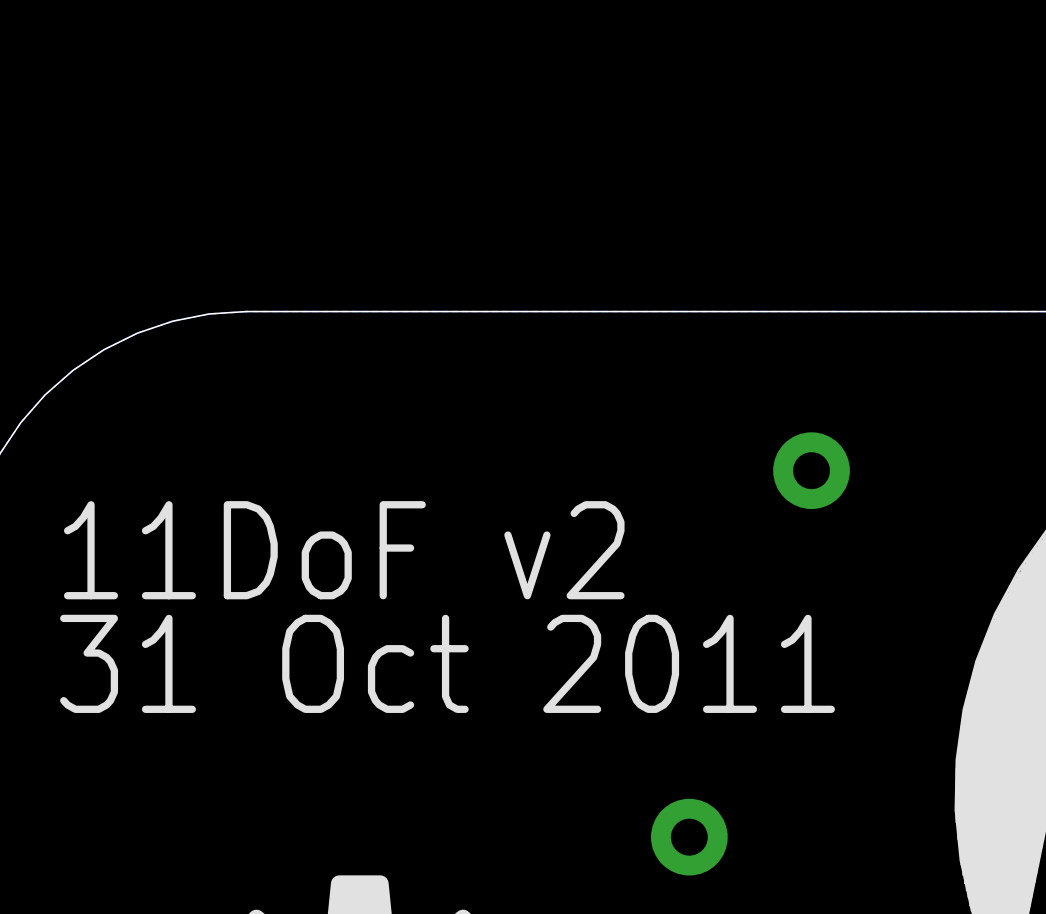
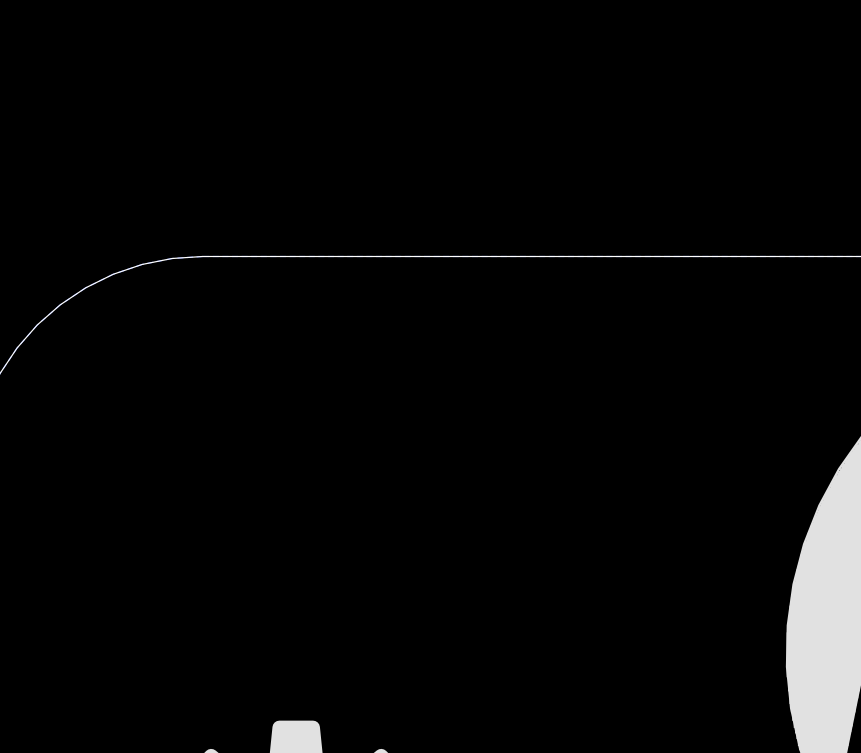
via: (811, 470) -> none
text: 11DoF v2 (344, 550) -> none
text: 31 Oct 2011 (447, 663) -> none
via: (689, 837) -> none

